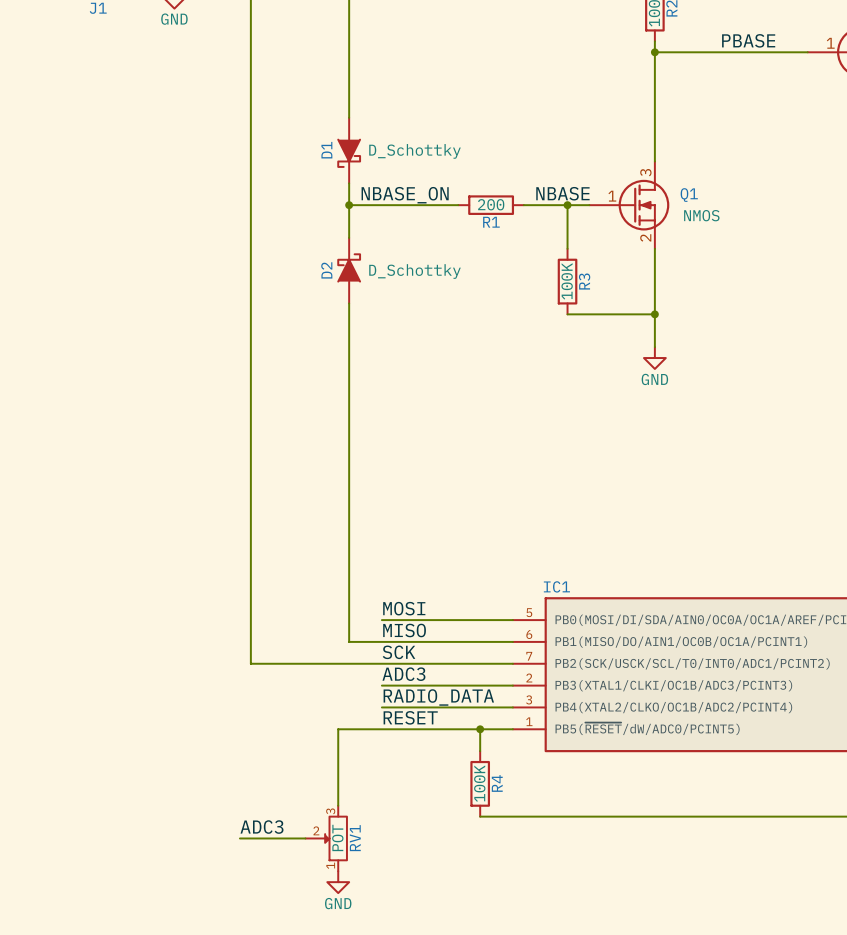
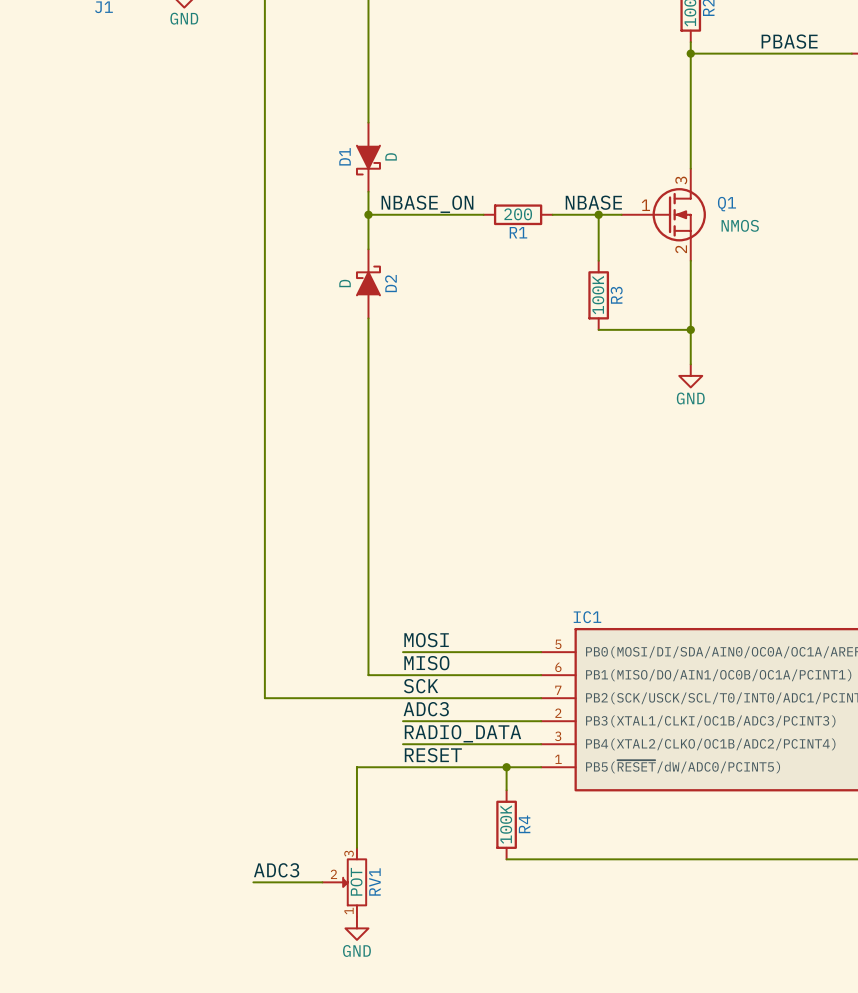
D1 value: D_Schottky (414, 151) -> D (391, 156)
D2 name position: D2 (326, 270) -> D2 (390, 283)
D2 value: D_Schottky (414, 271) -> D (345, 283)

